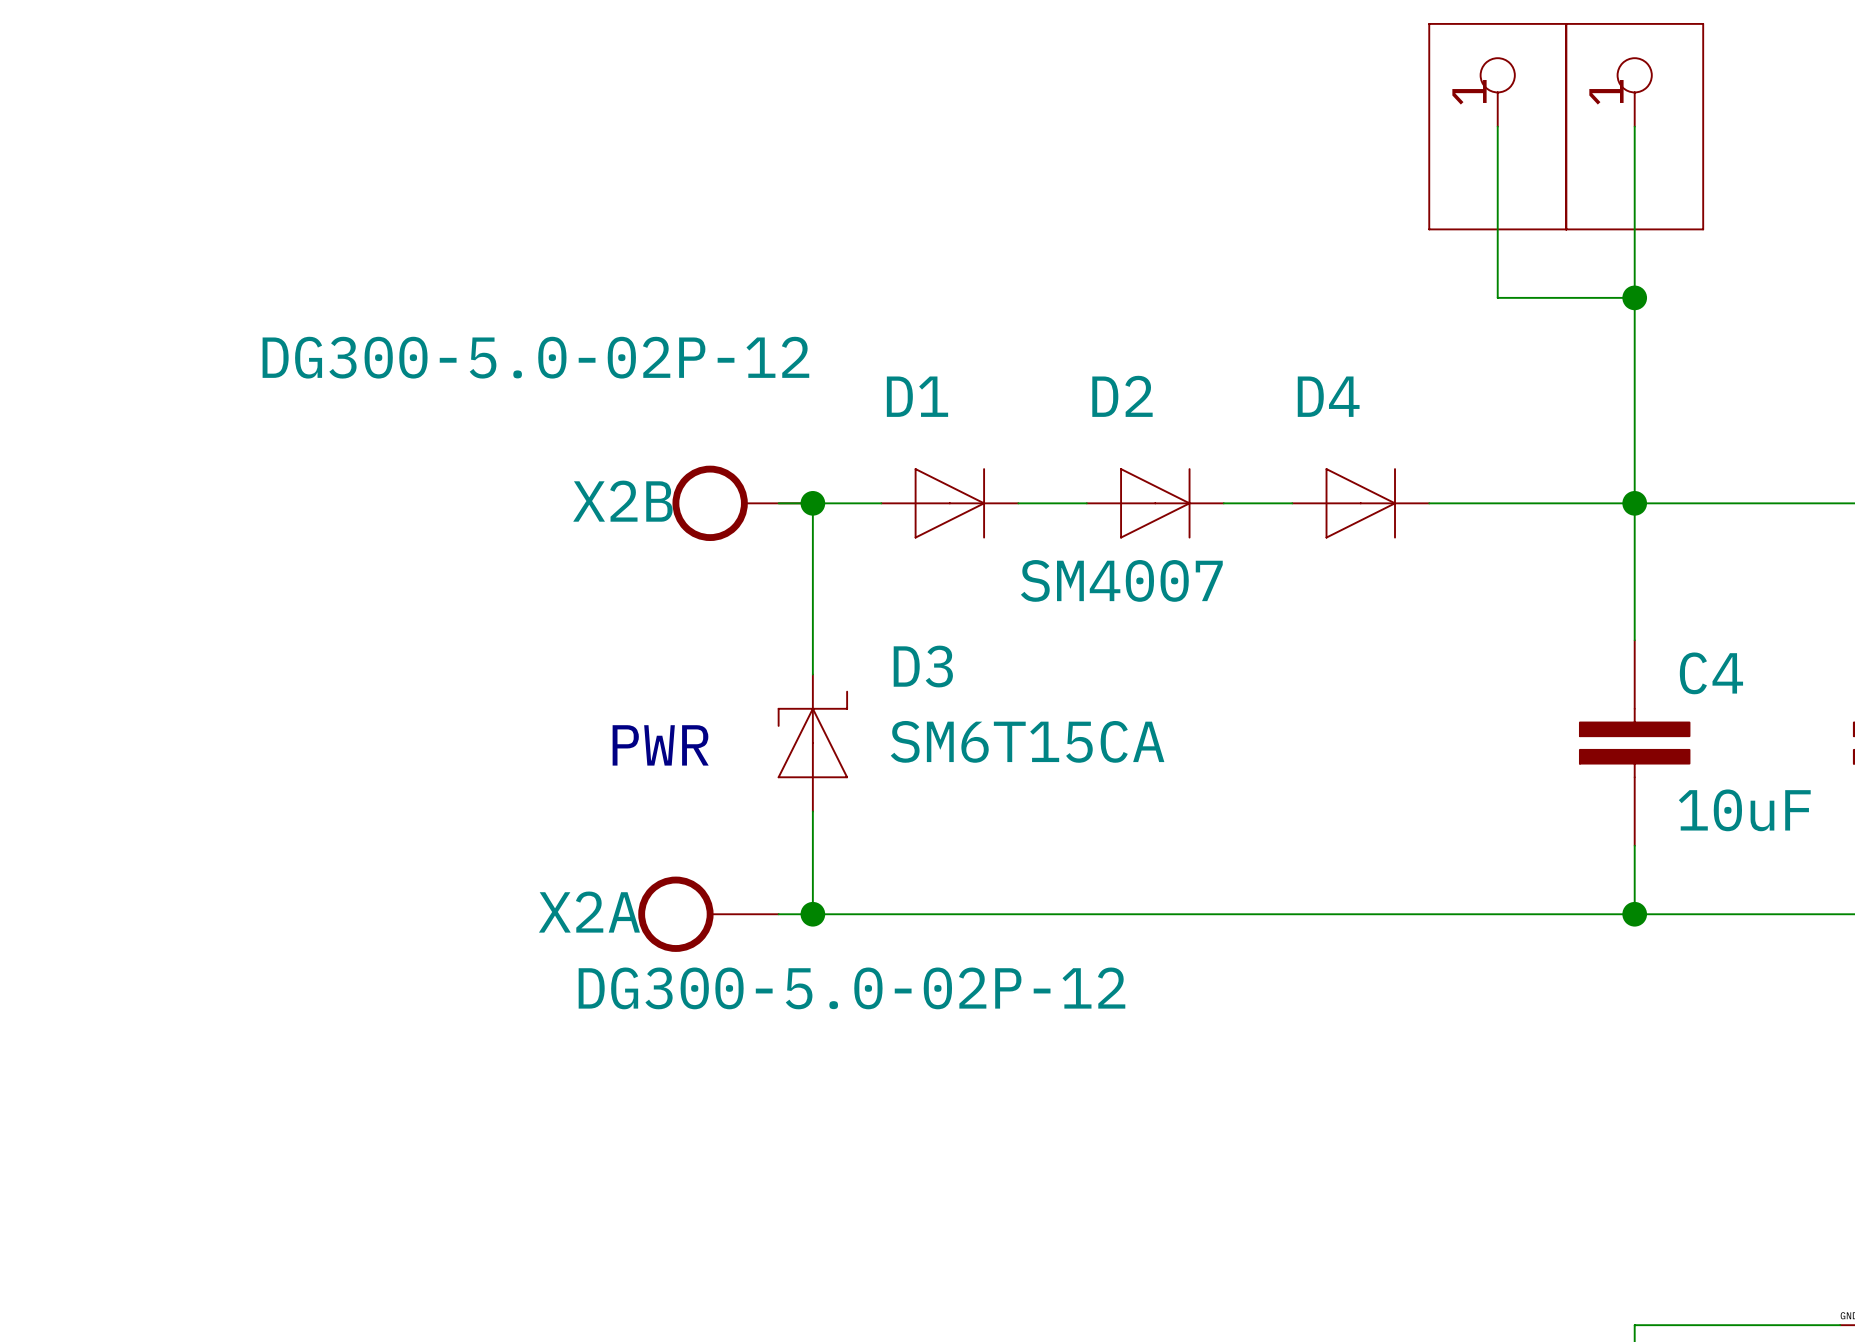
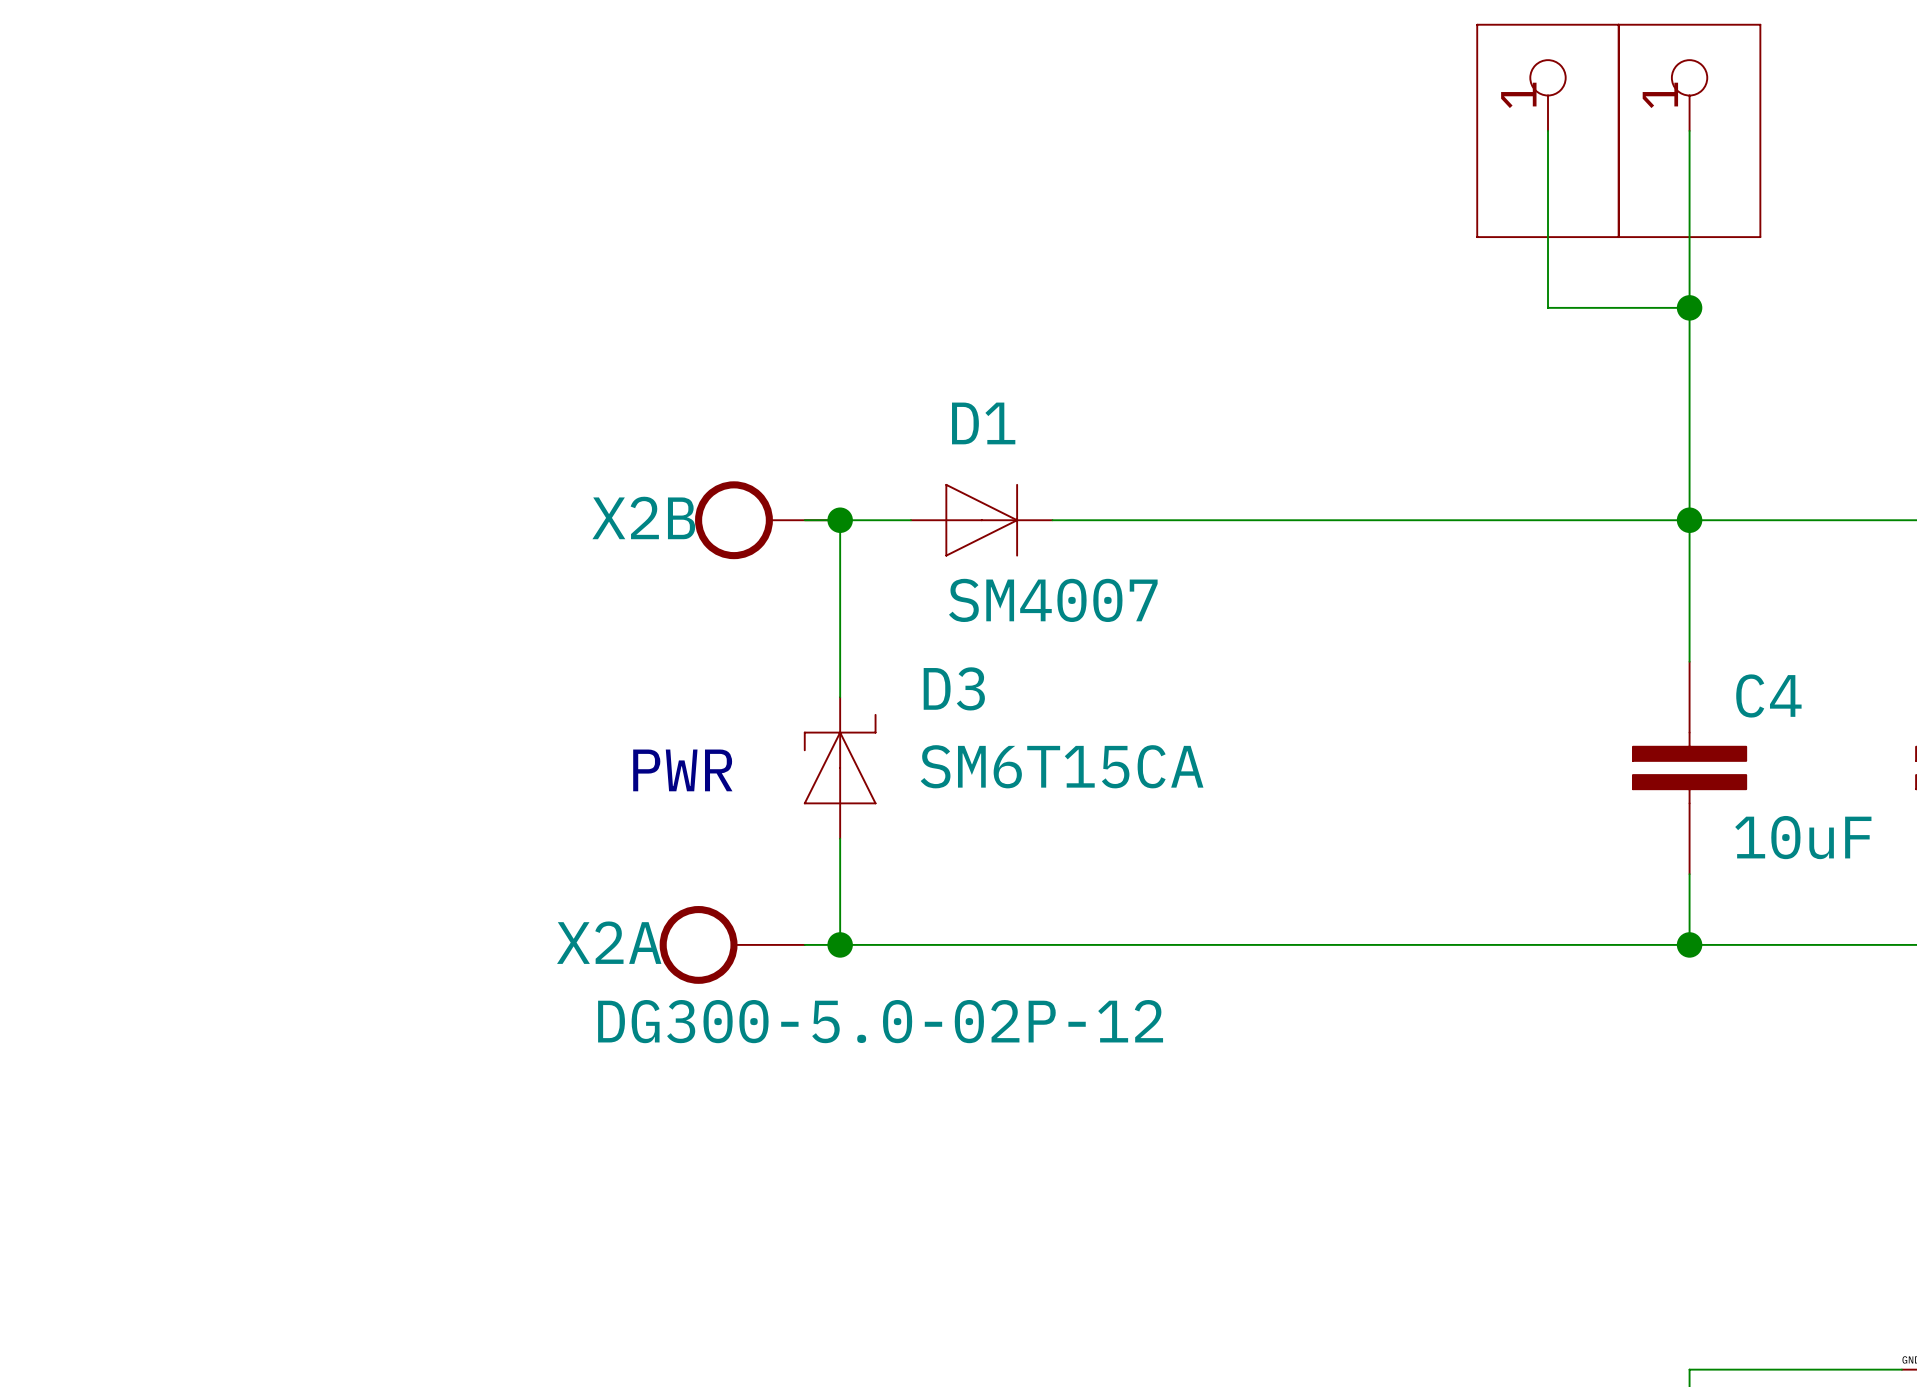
X2B value: DG300-5.0-02P-12 (535, 357) -> none
D1 name position: D1 (917, 396) -> D1 (983, 423)
D2: (1155, 503) -> none
D4: (1360, 503) -> none
D1 value position: SM4007 (1121, 580) -> SM4007 (1053, 600)

